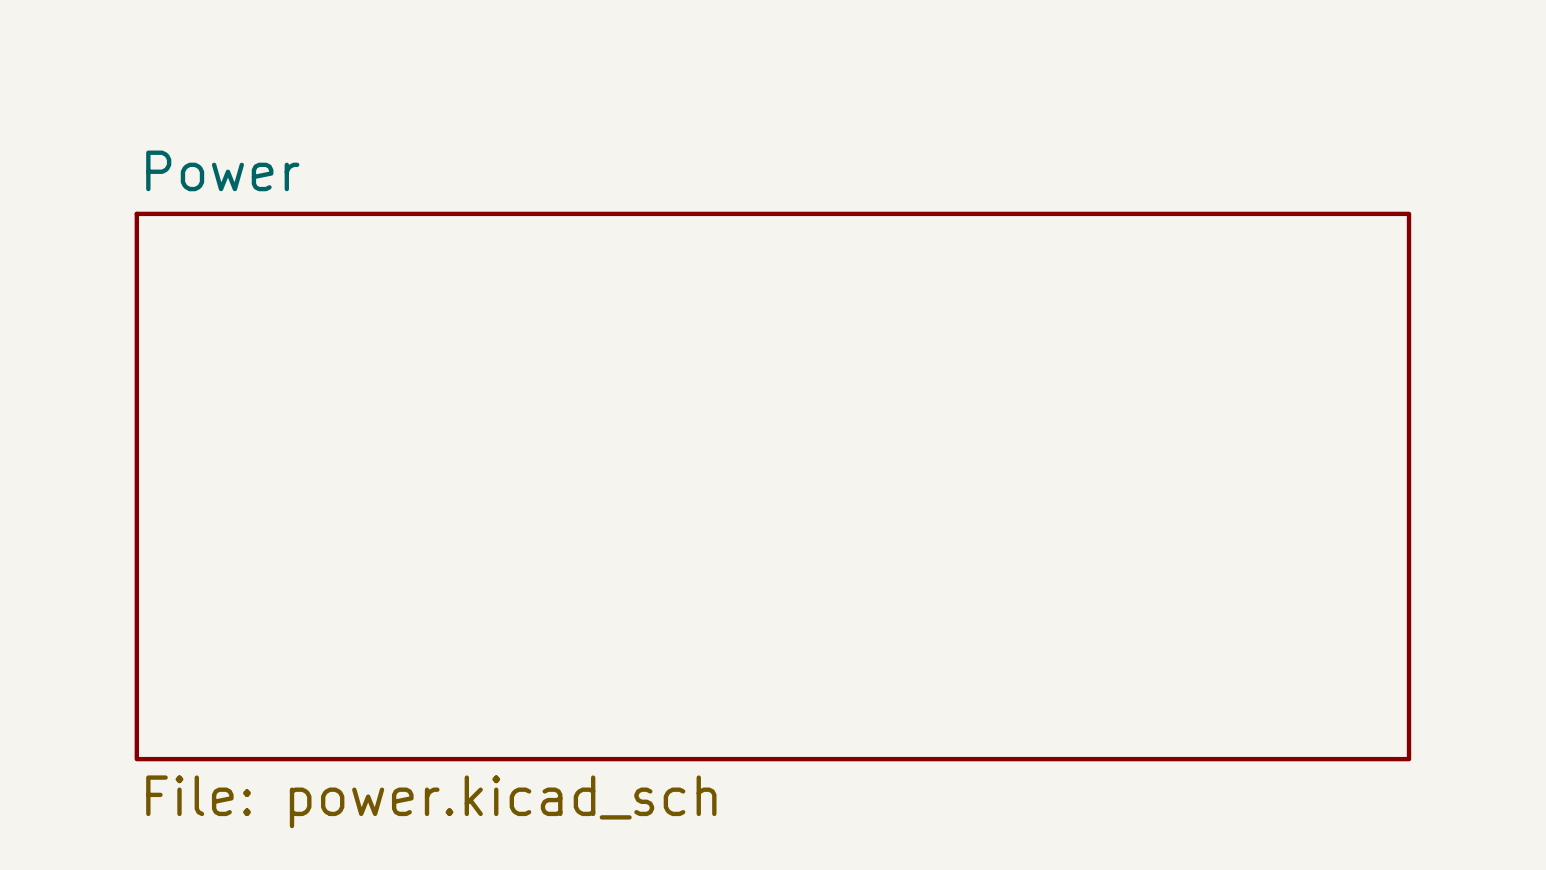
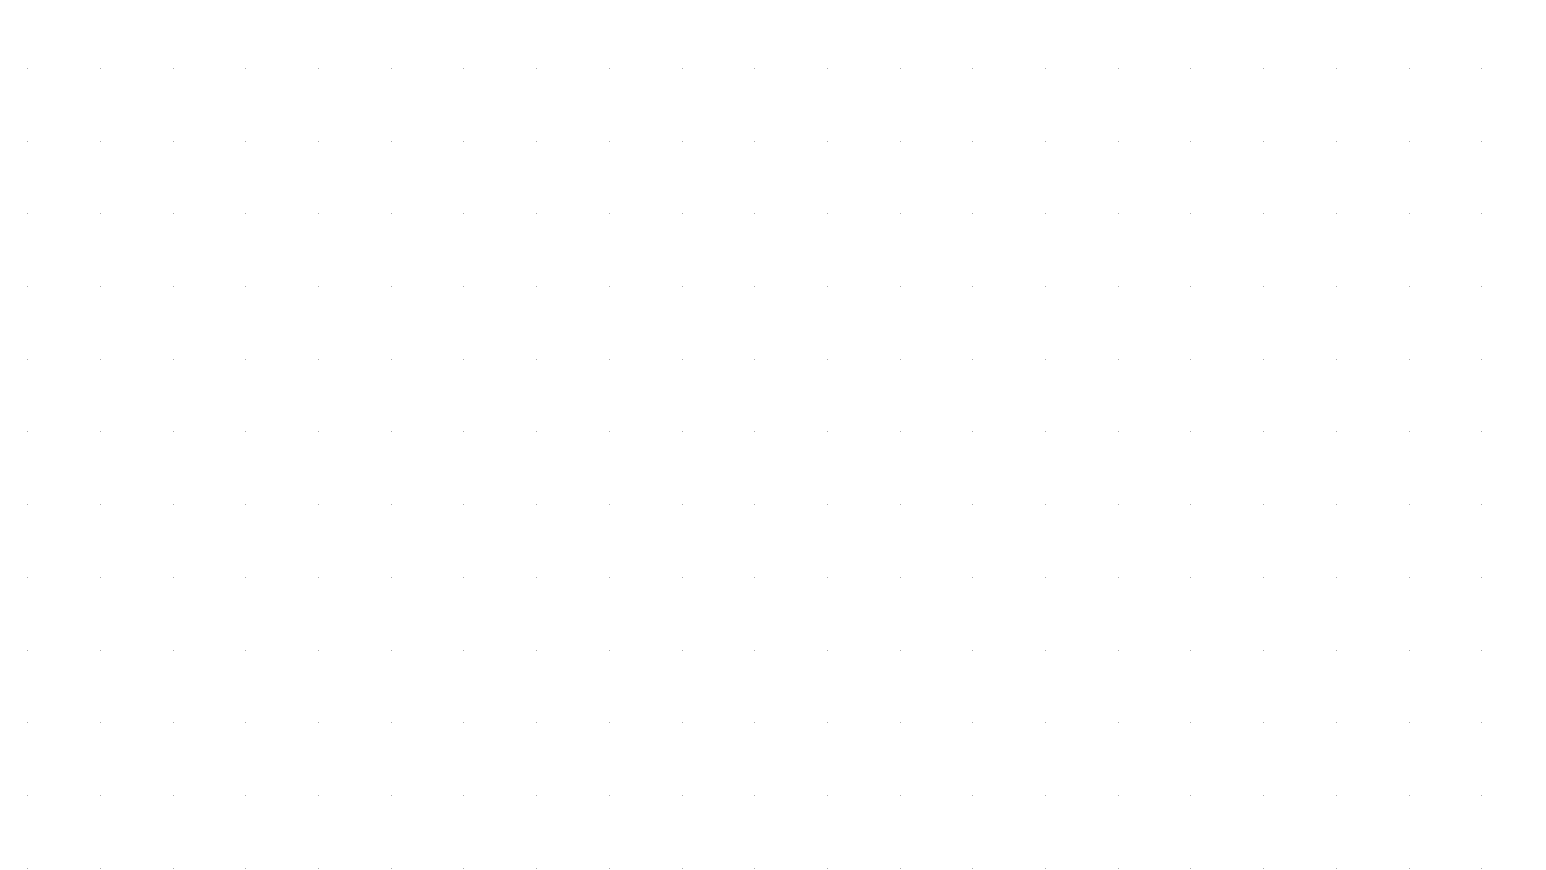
sheet Power: File: power.kicad_sch (772, 486) -> none

